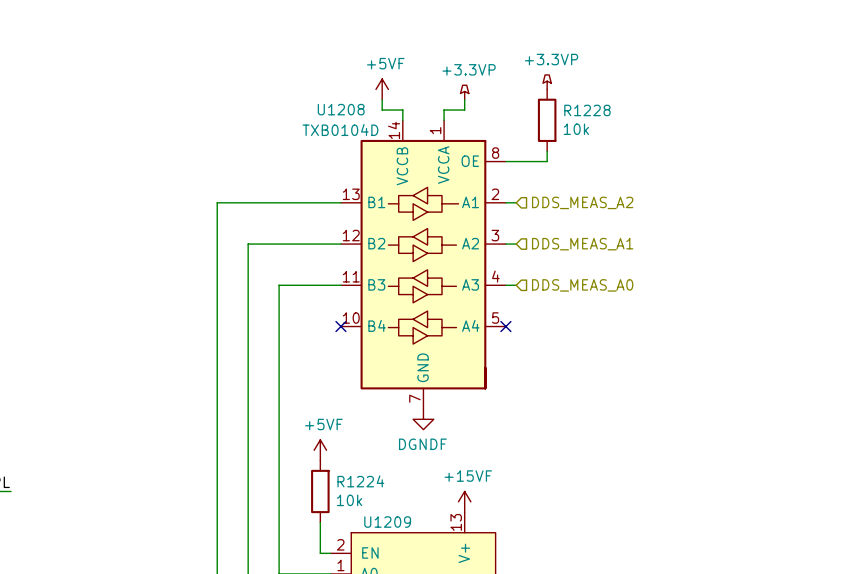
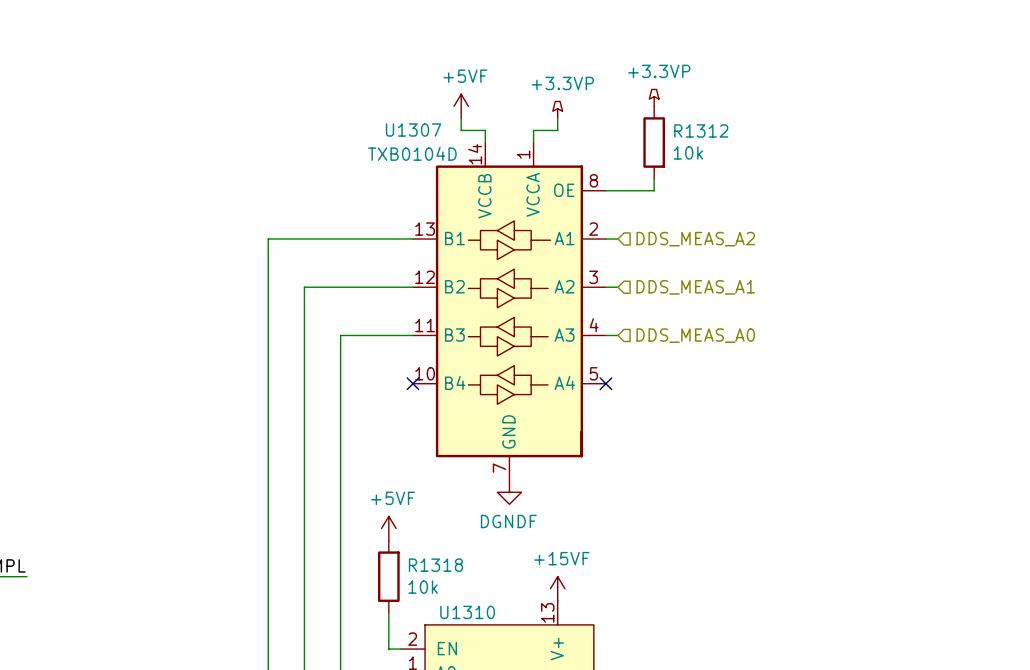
U1208 name: U1208 (341, 109) -> U1307 (413, 130)
R1228 name: R1228 (587, 110) -> R1312 (701, 130)
R1224 name: R1224 (360, 481) -> R1318 (435, 565)
U1209 name: U1209 (387, 522) -> U1310 (467, 612)

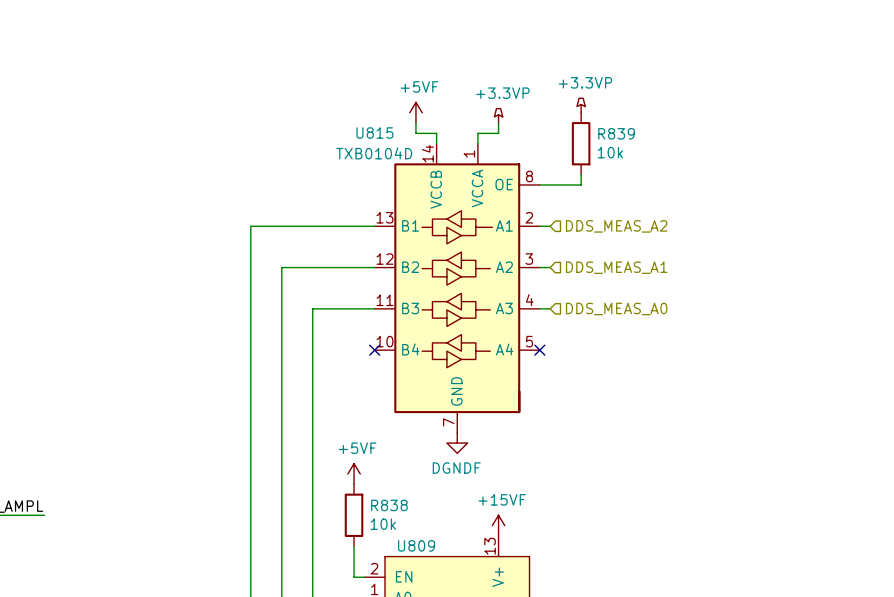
U1307 name: U1307 (413, 130) -> U815 (374, 133)
R1312 name: R1312 (701, 130) -> R839 (616, 133)
R1318 name: R1318 (435, 565) -> R838 (389, 505)
U1310 name: U1310 (467, 612) -> U809 (416, 545)

